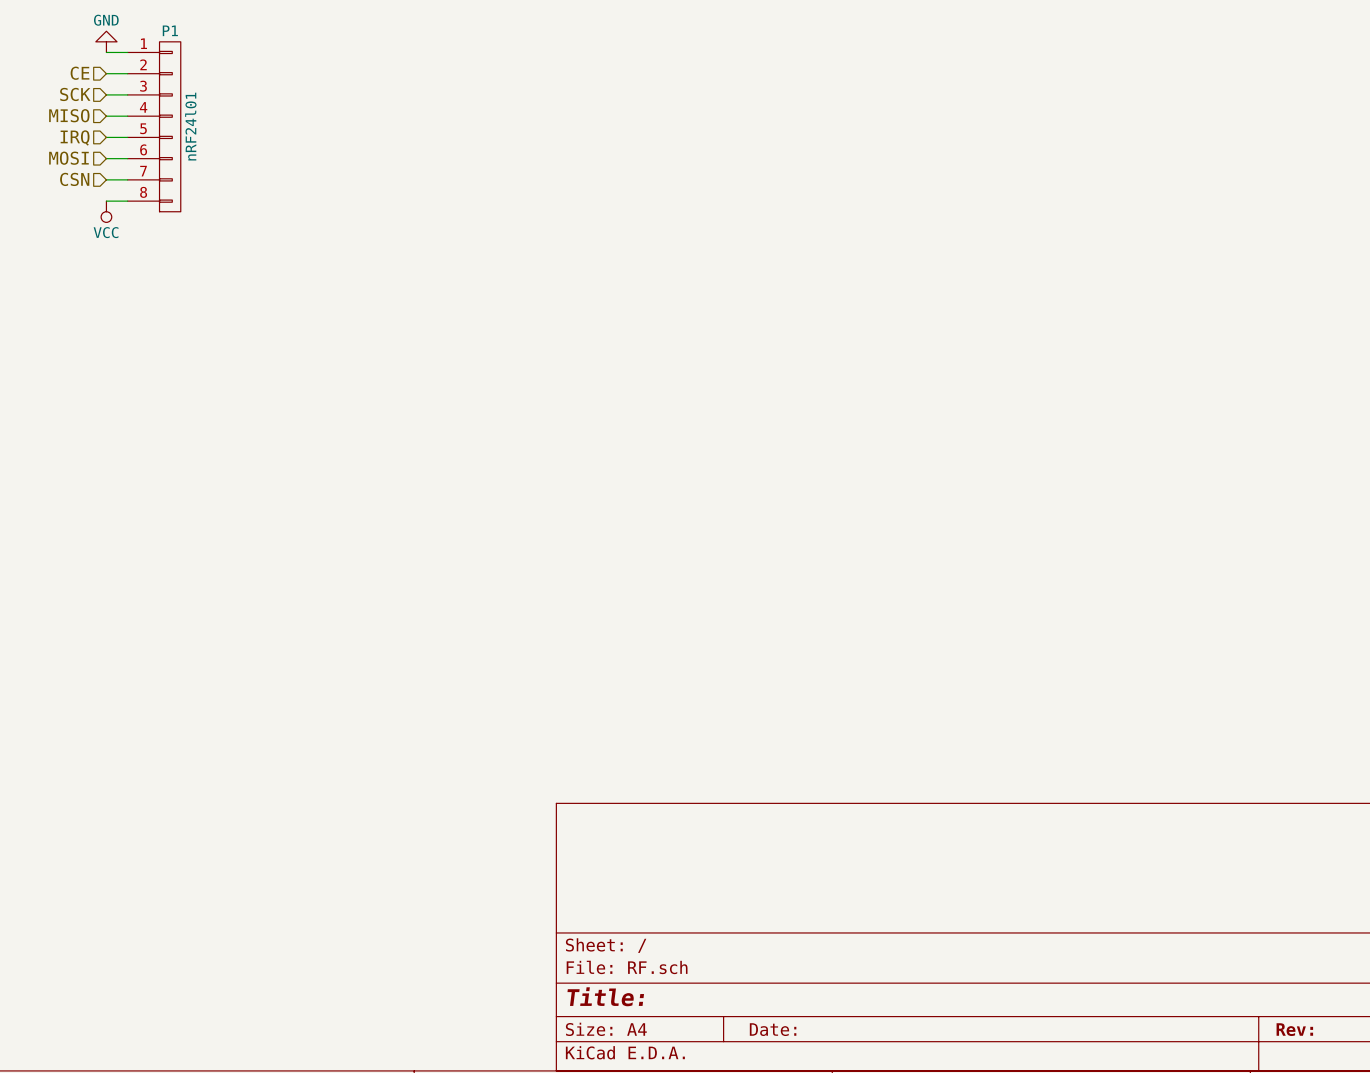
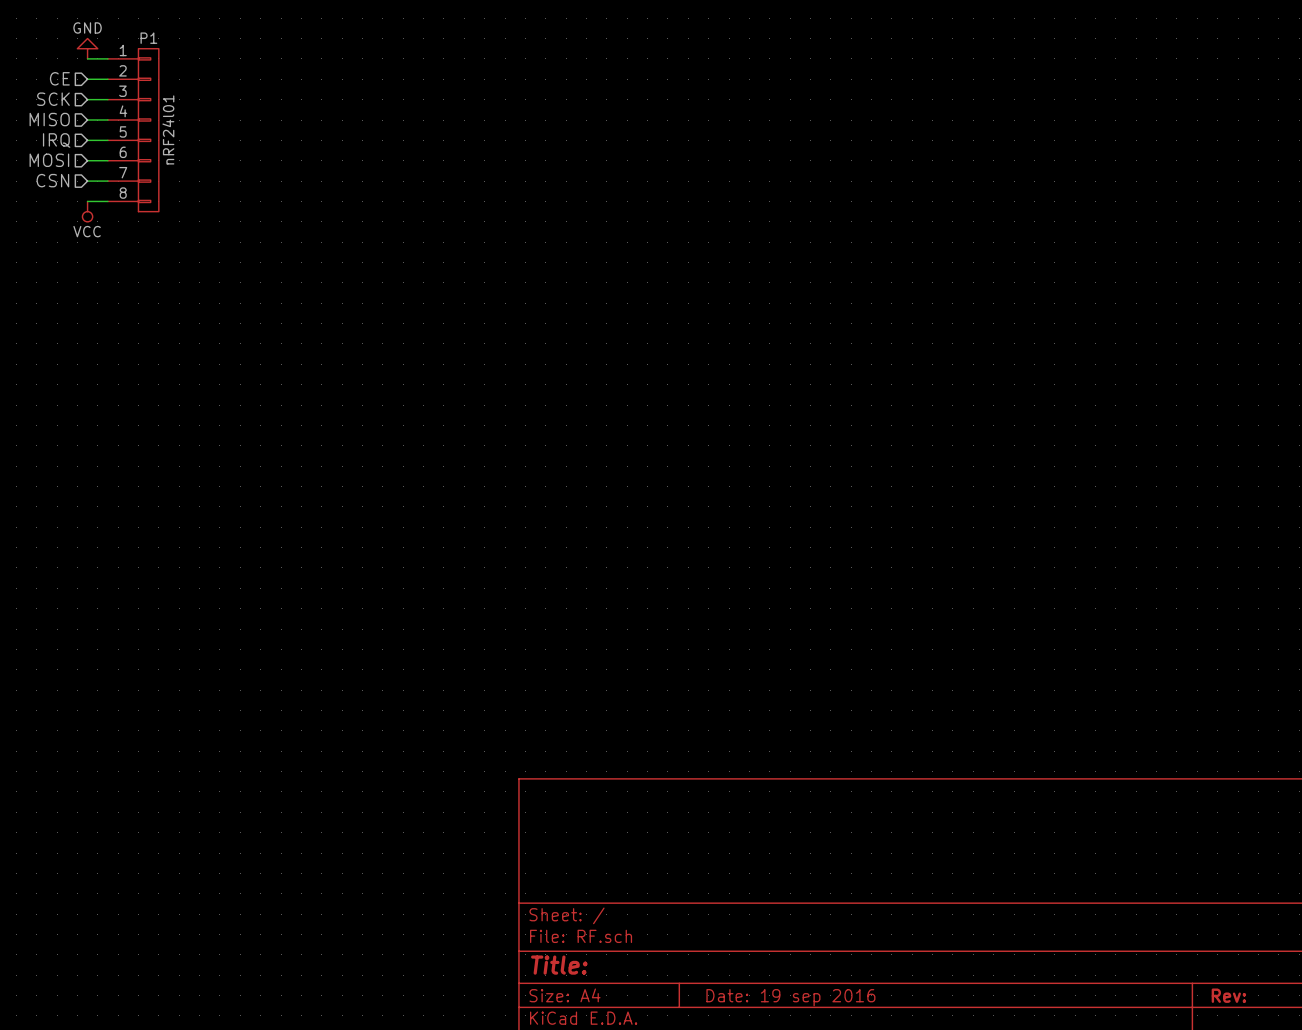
title block: Date: (773, 1029) -> Date: 19 sep 2016 (790, 997)

